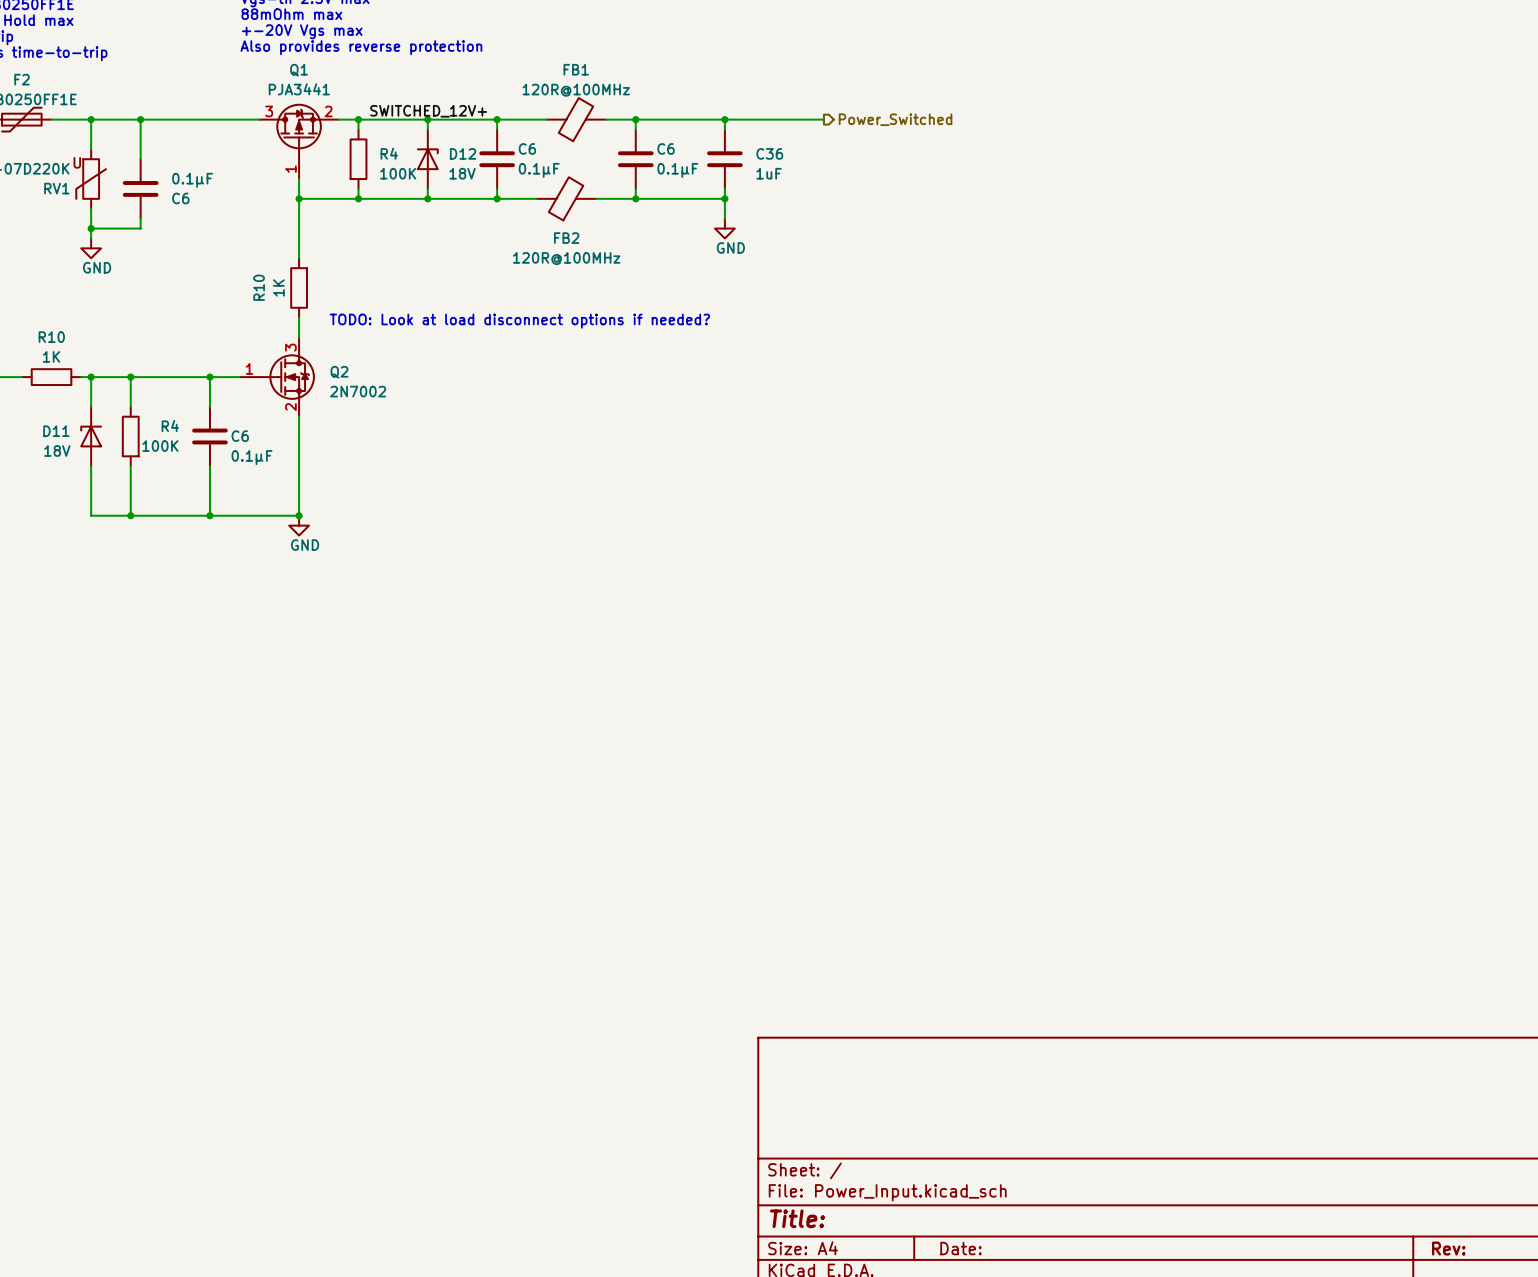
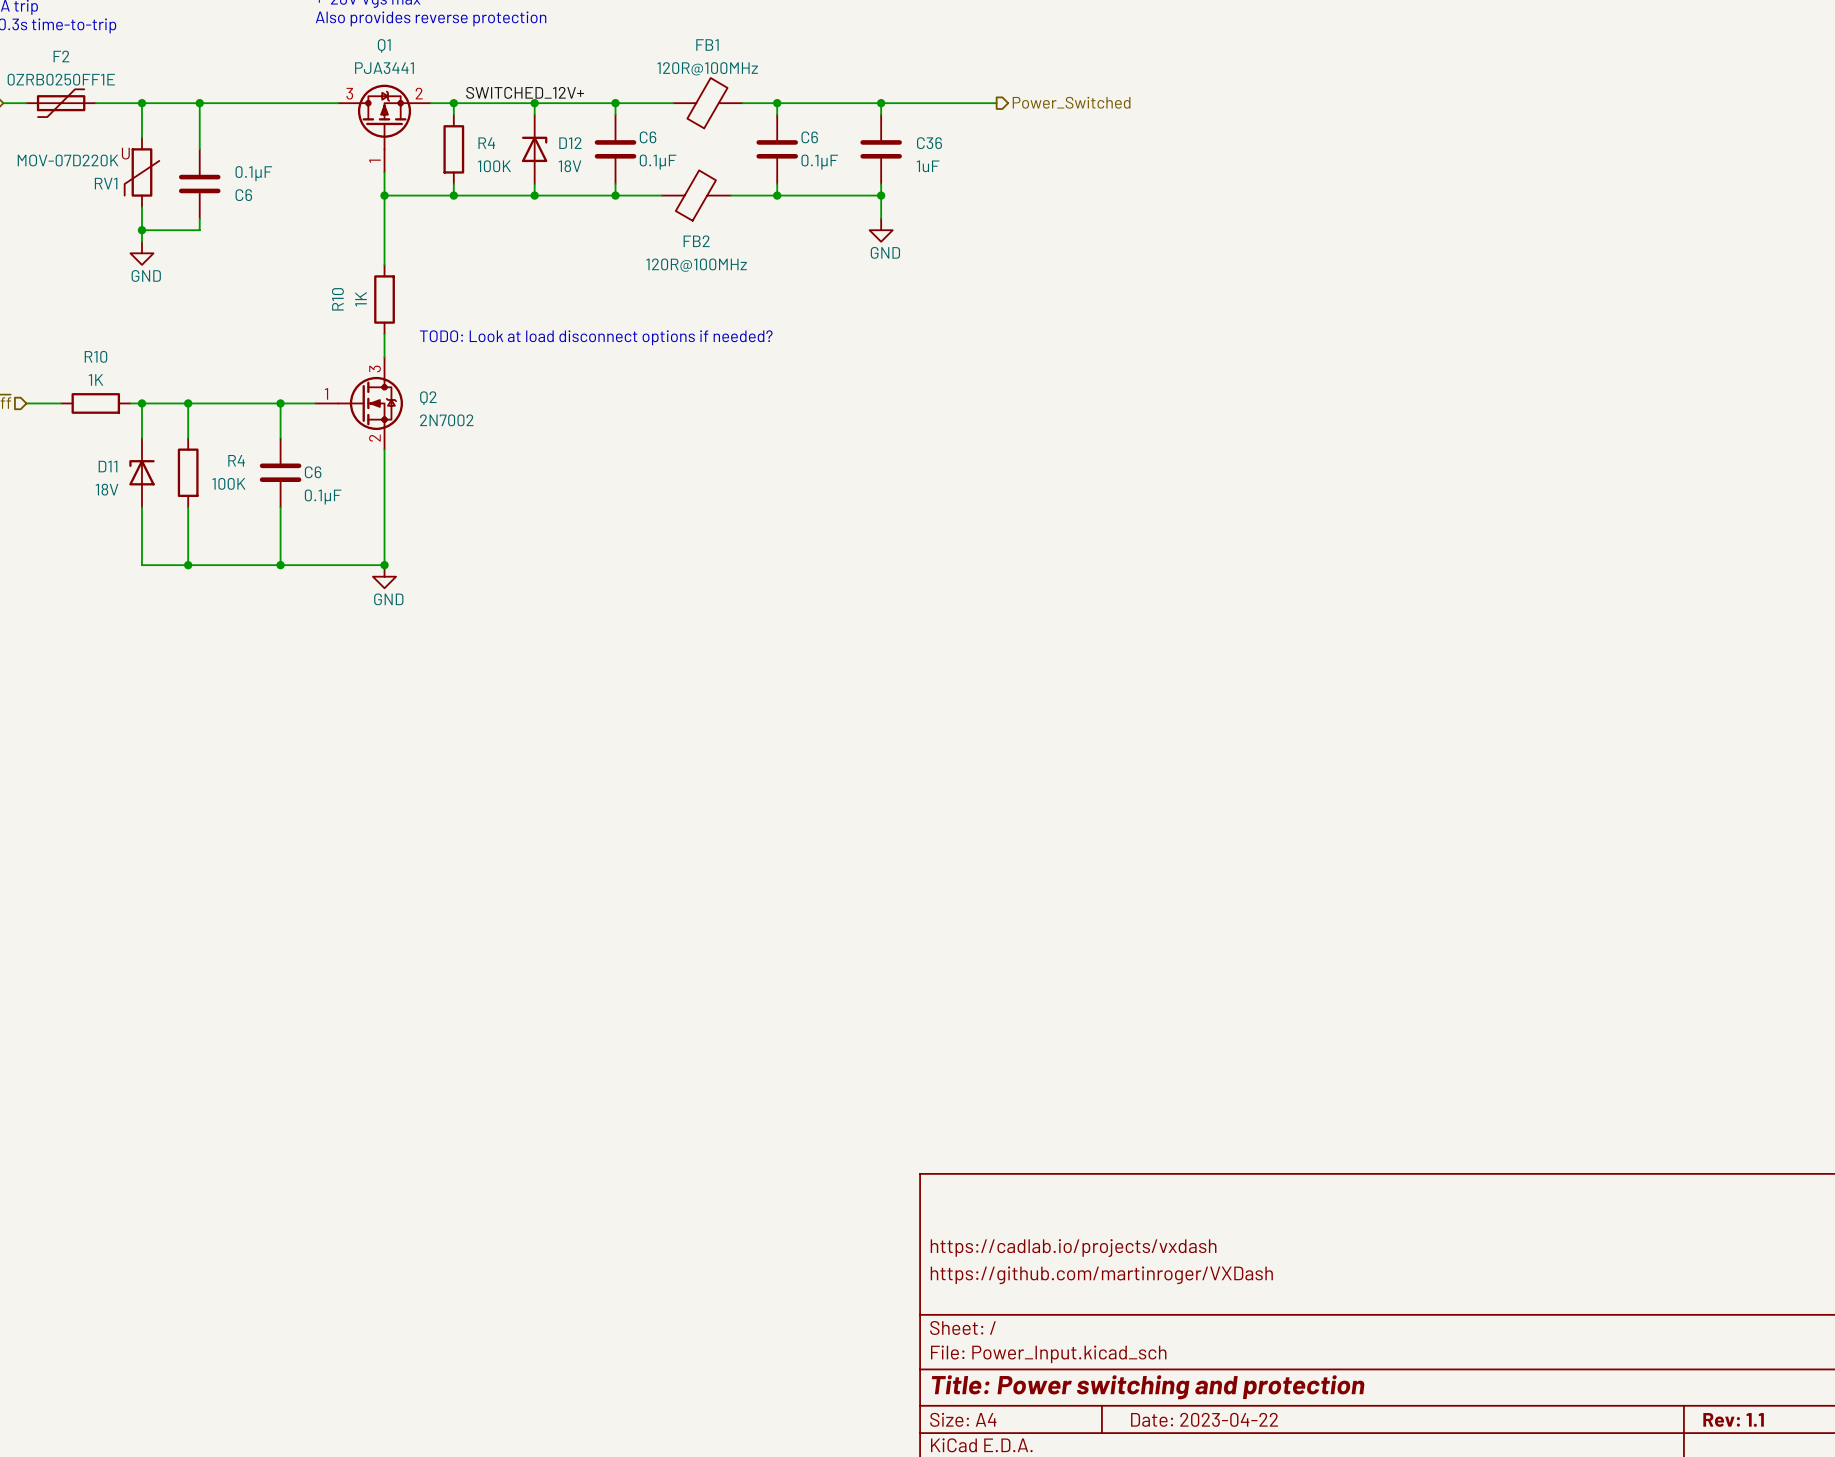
title block: none -> https://cadlab.io/projects/vxdash (1073, 1248)
title block: none -> https://github.com/martinroger/VXDash (1101, 1275)
title block: Title: (797, 1218) -> Title: Power switching and protection (1148, 1387)
title block: Date: (960, 1248) -> Date: 2023-04-22 (1204, 1419)
title block: Rev: (1448, 1248) -> Rev: 1.1 (1733, 1419)

